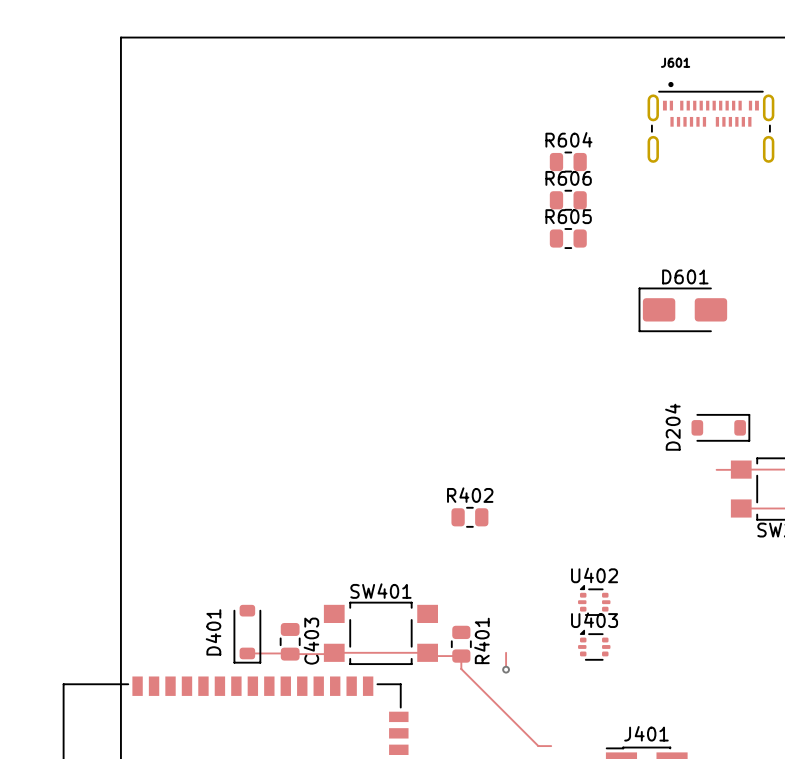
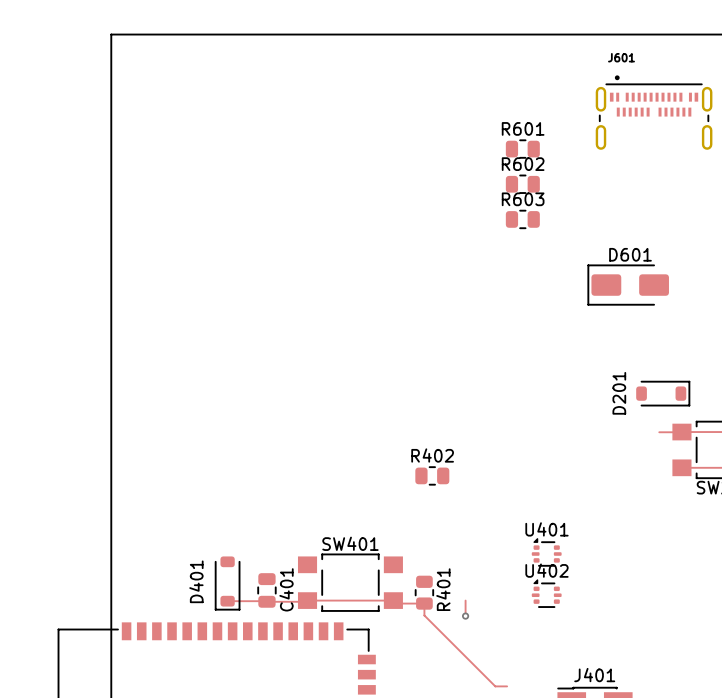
R604 name: R604 (568, 139) -> R601 (523, 128)
R606 name: R606 (568, 178) -> R602 (523, 164)
R605 name: R605 (568, 216) -> R603 (523, 199)
D204 name: D204 (672, 427) -> D201 (619, 393)
U402 name: U402 (594, 575) -> U401 (546, 529)
U403 name: U403 (594, 620) -> U402 (546, 570)
C403 name: C403 (311, 641) -> C401 (286, 589)

